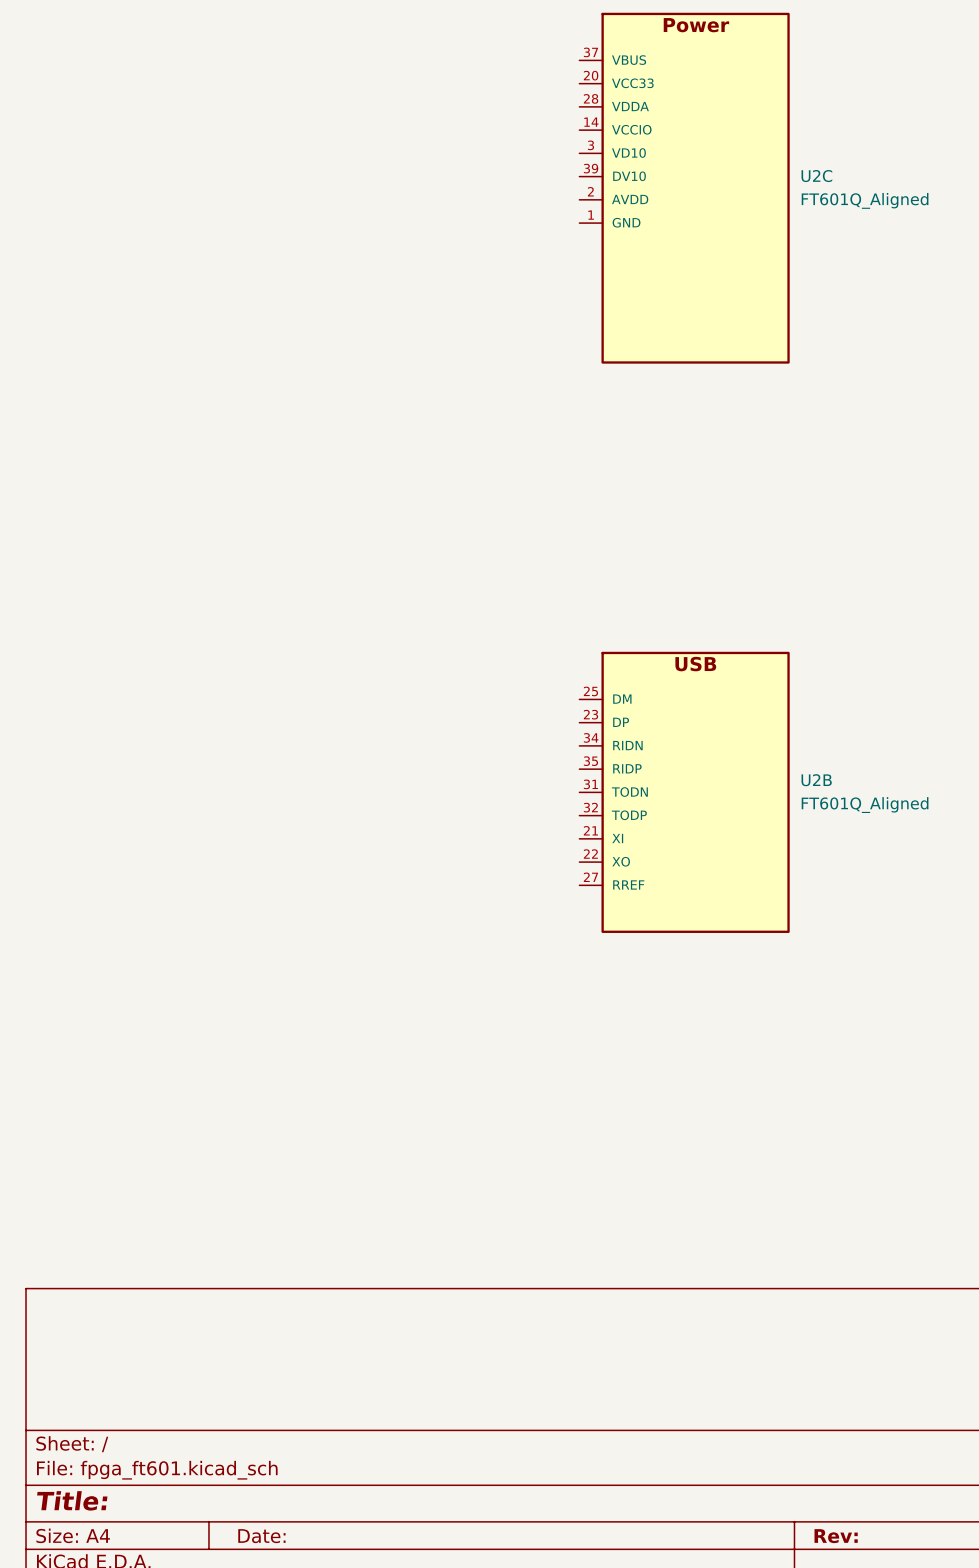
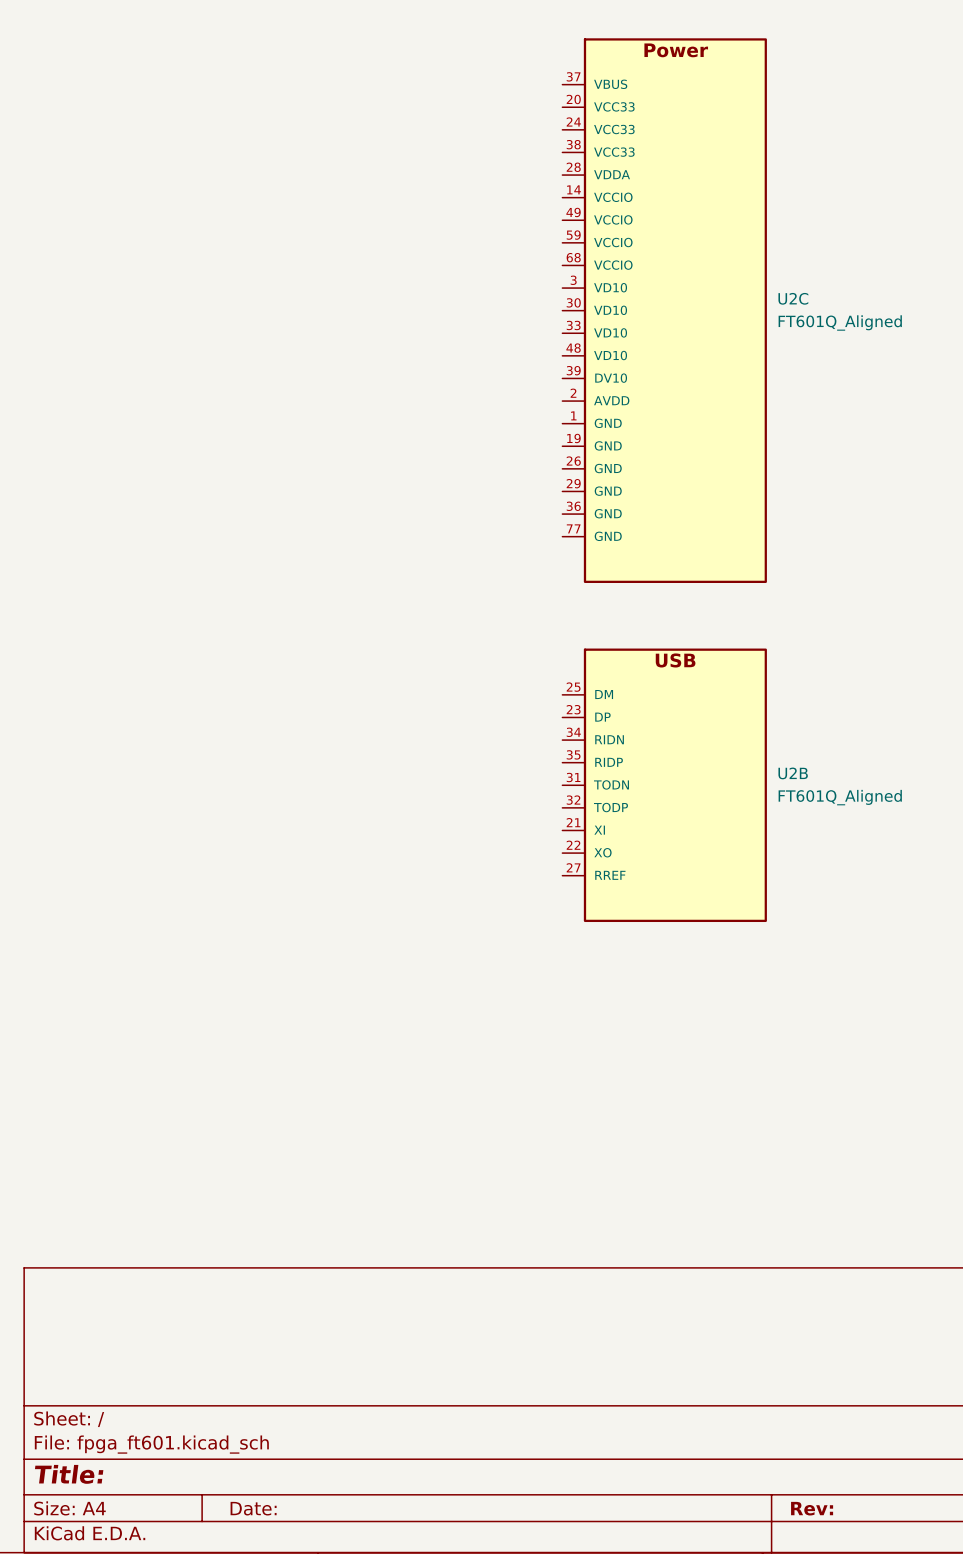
U2C symbol: [579, 12, 790, 364] -> [562, 38, 767, 583]

